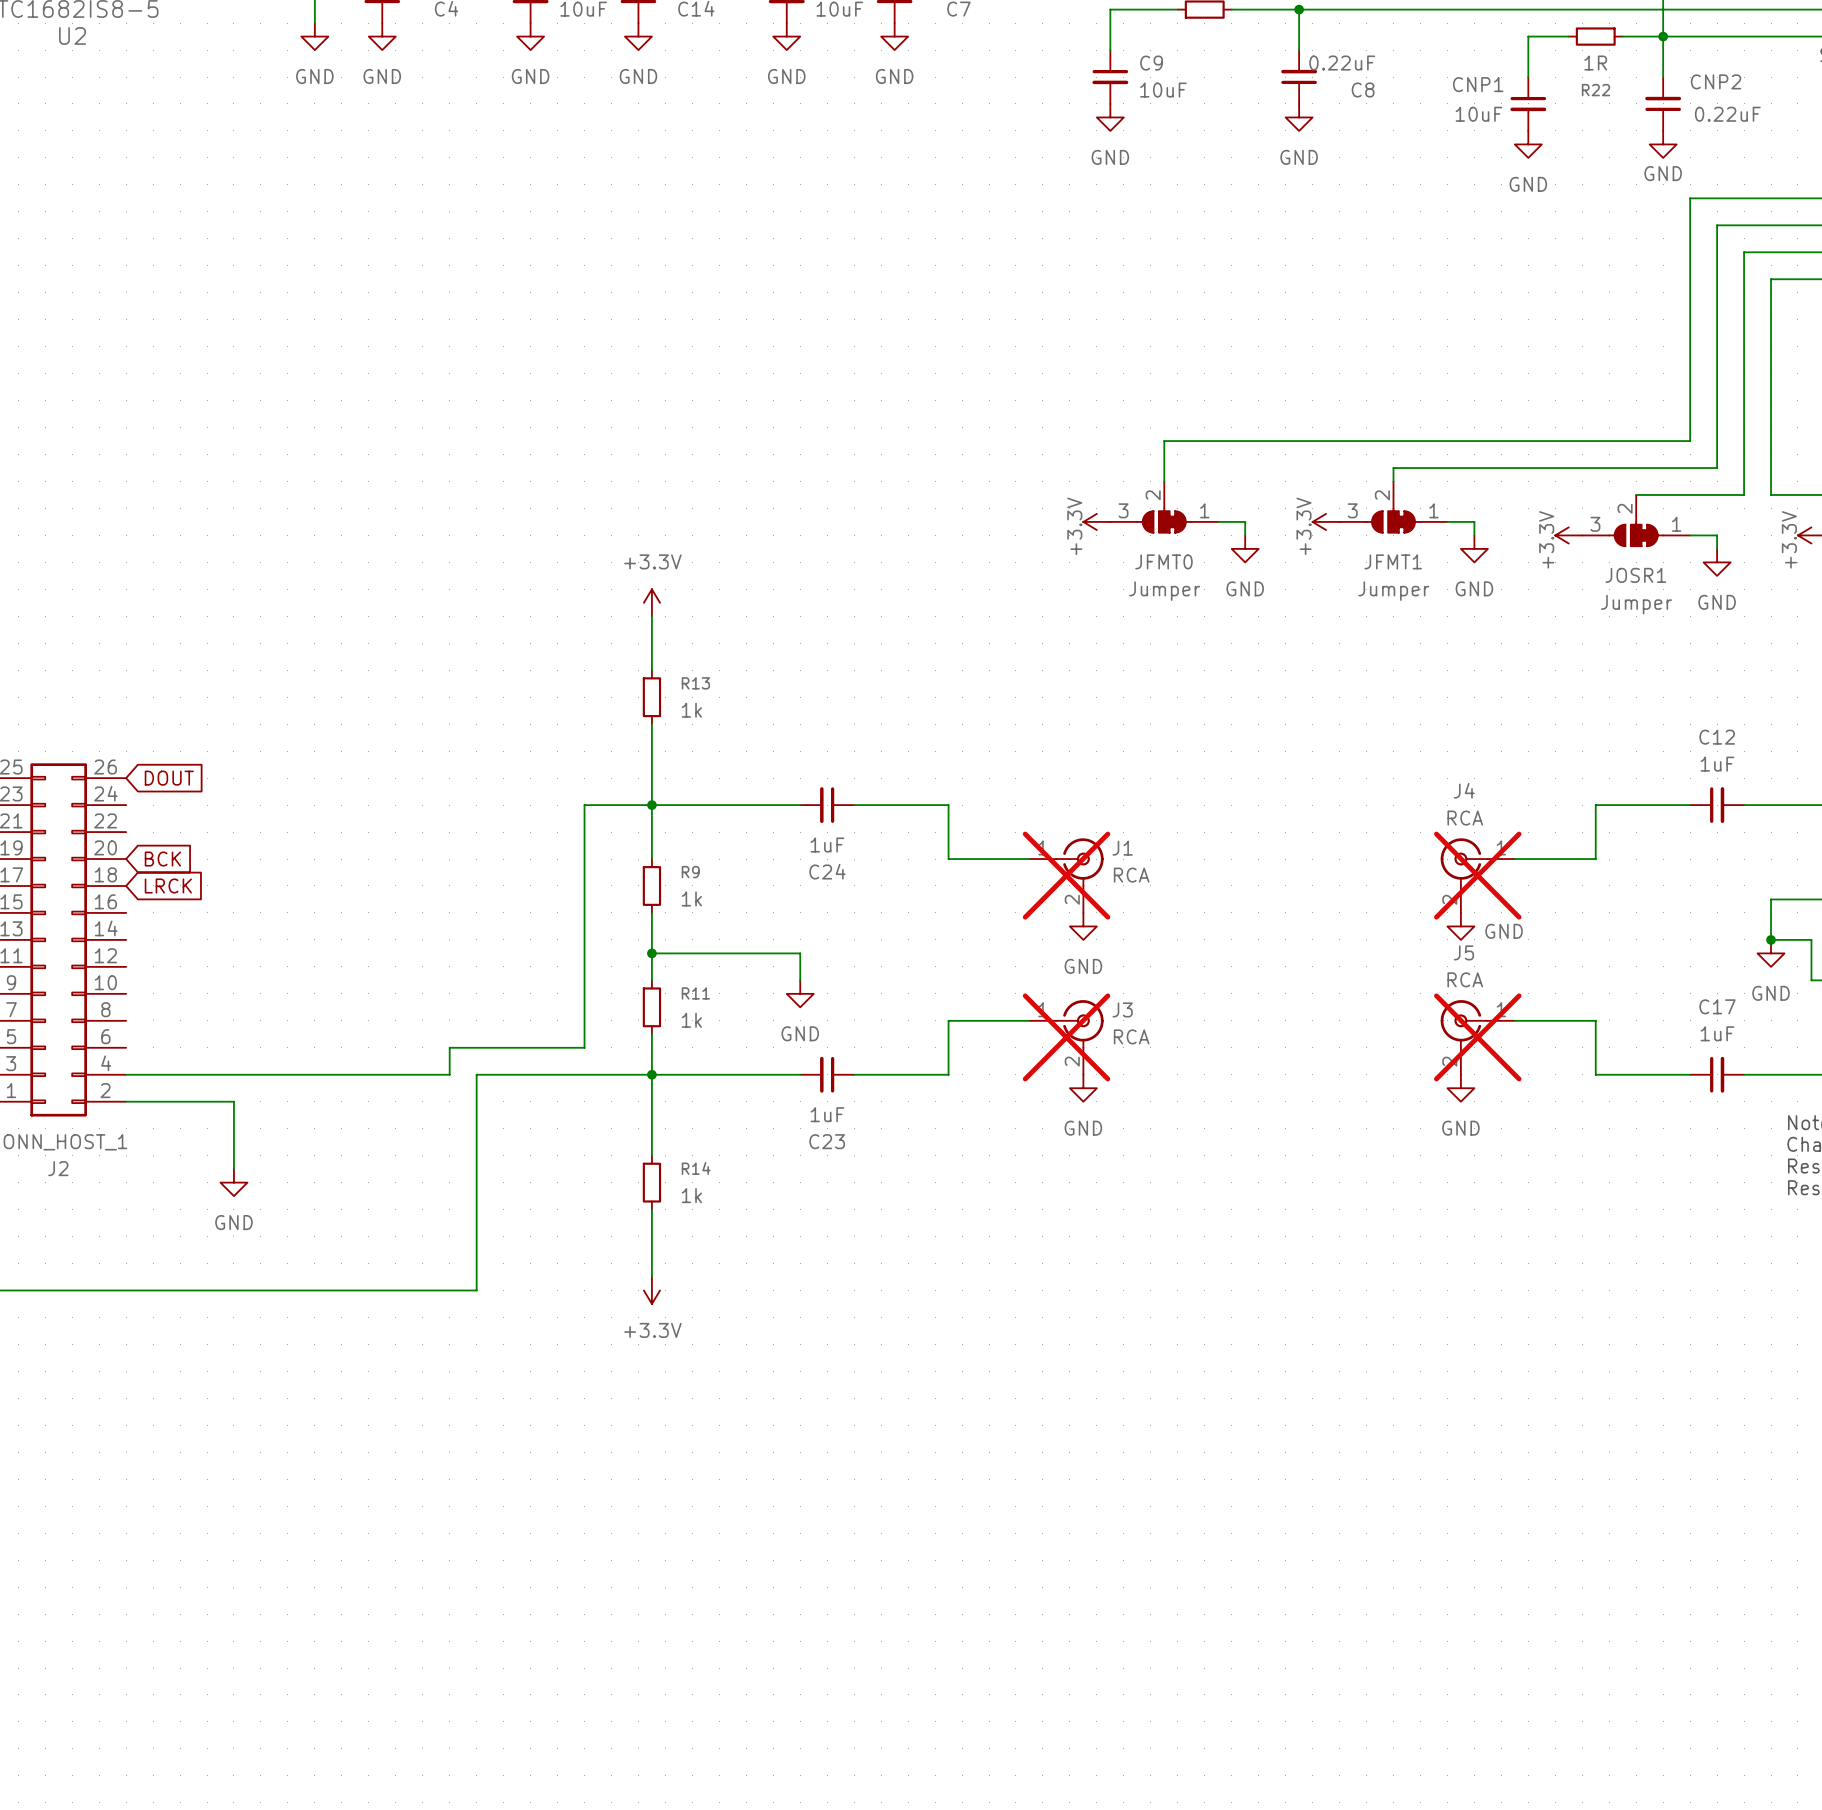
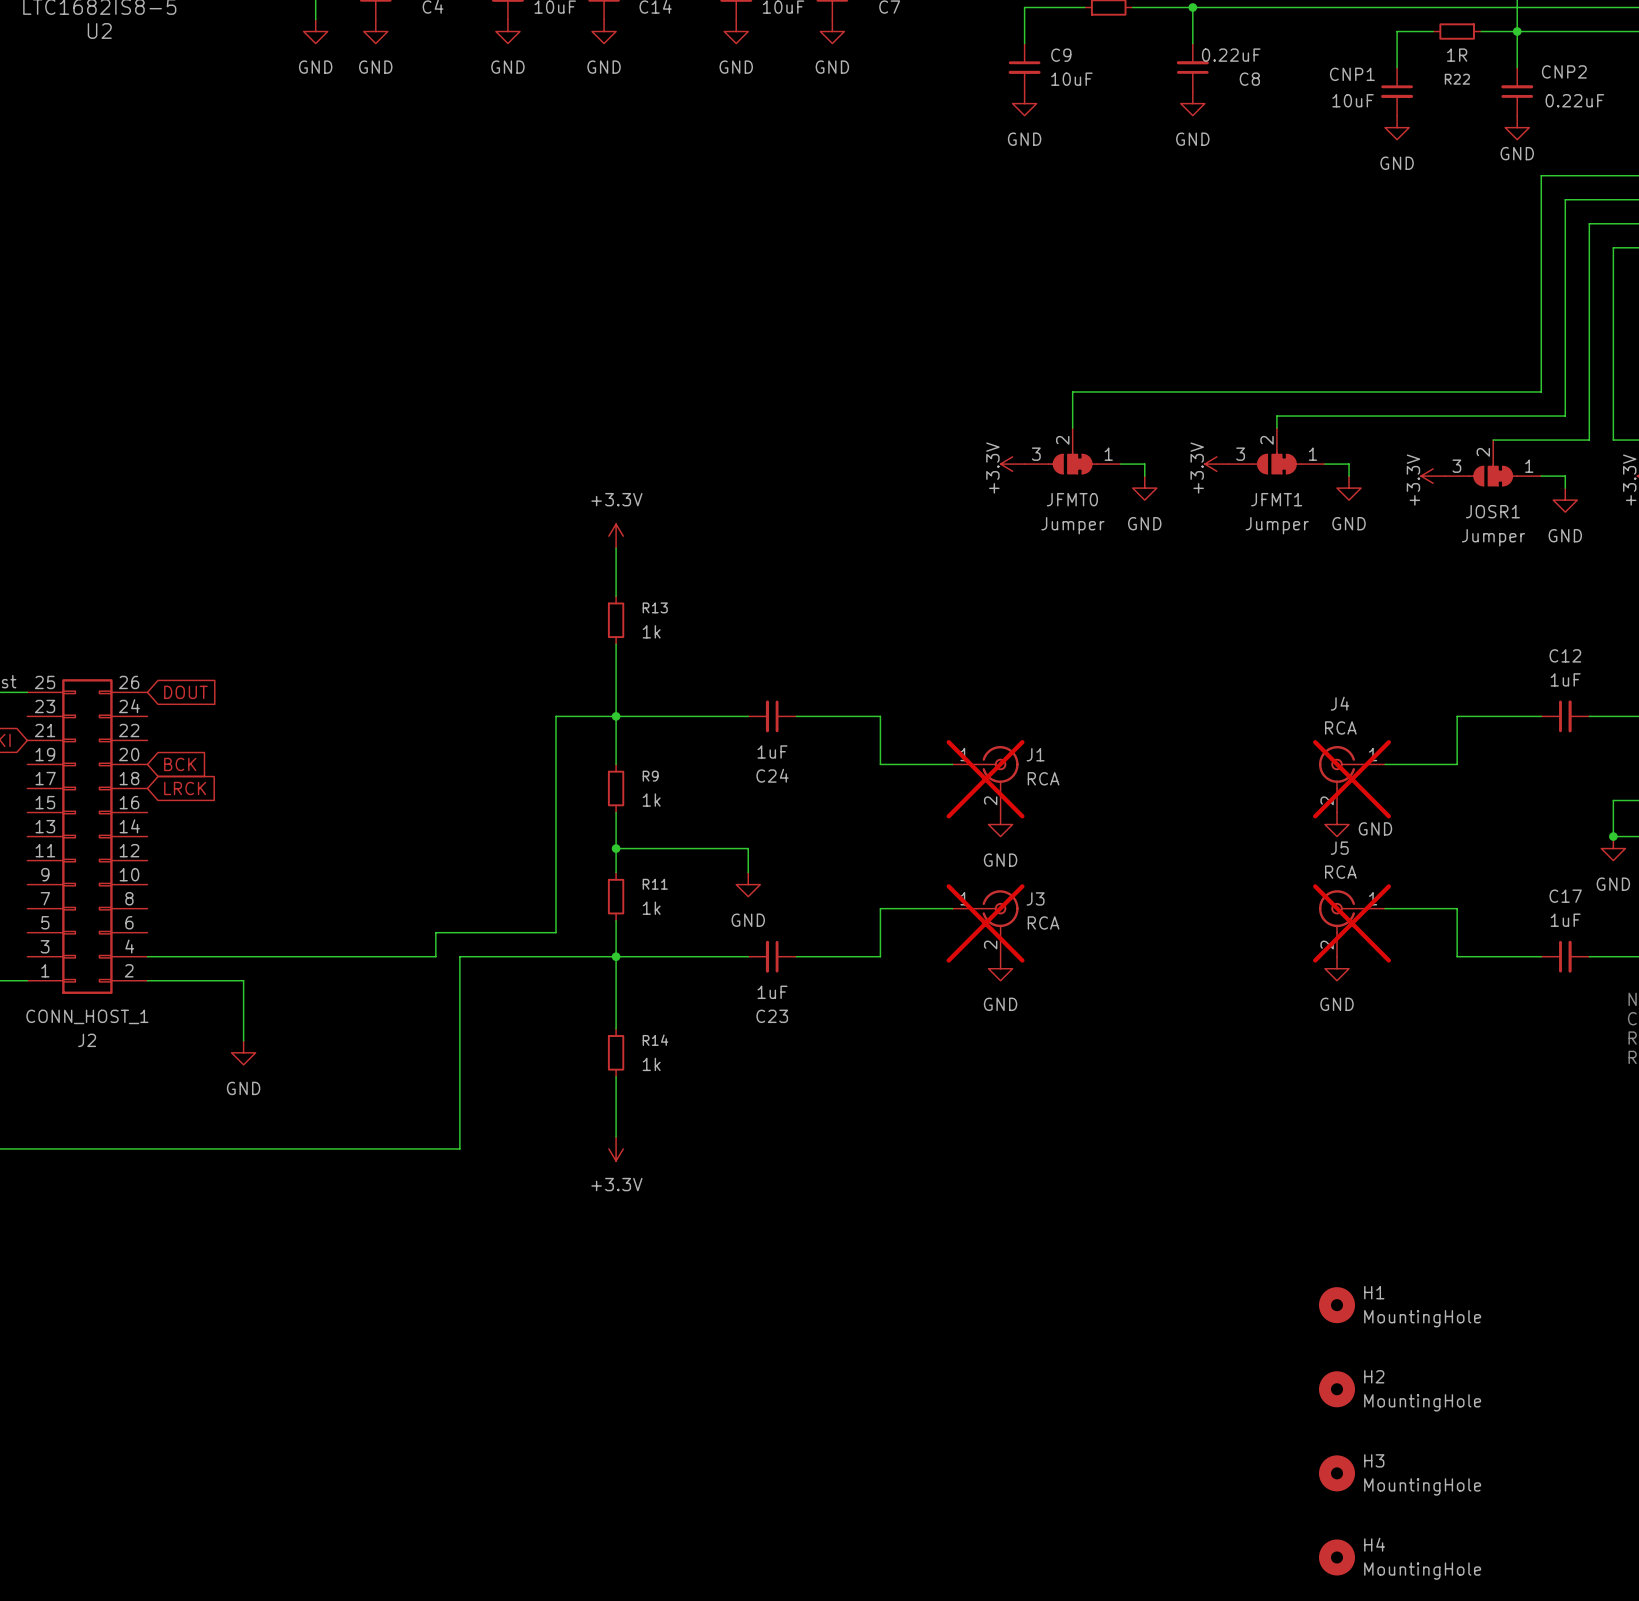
H1: none -> MountingHole (1337, 1305)
H2: none -> MountingHole (1337, 1389)
H3: none -> MountingHole (1337, 1473)
H4: none -> MountingHole (1337, 1557)

